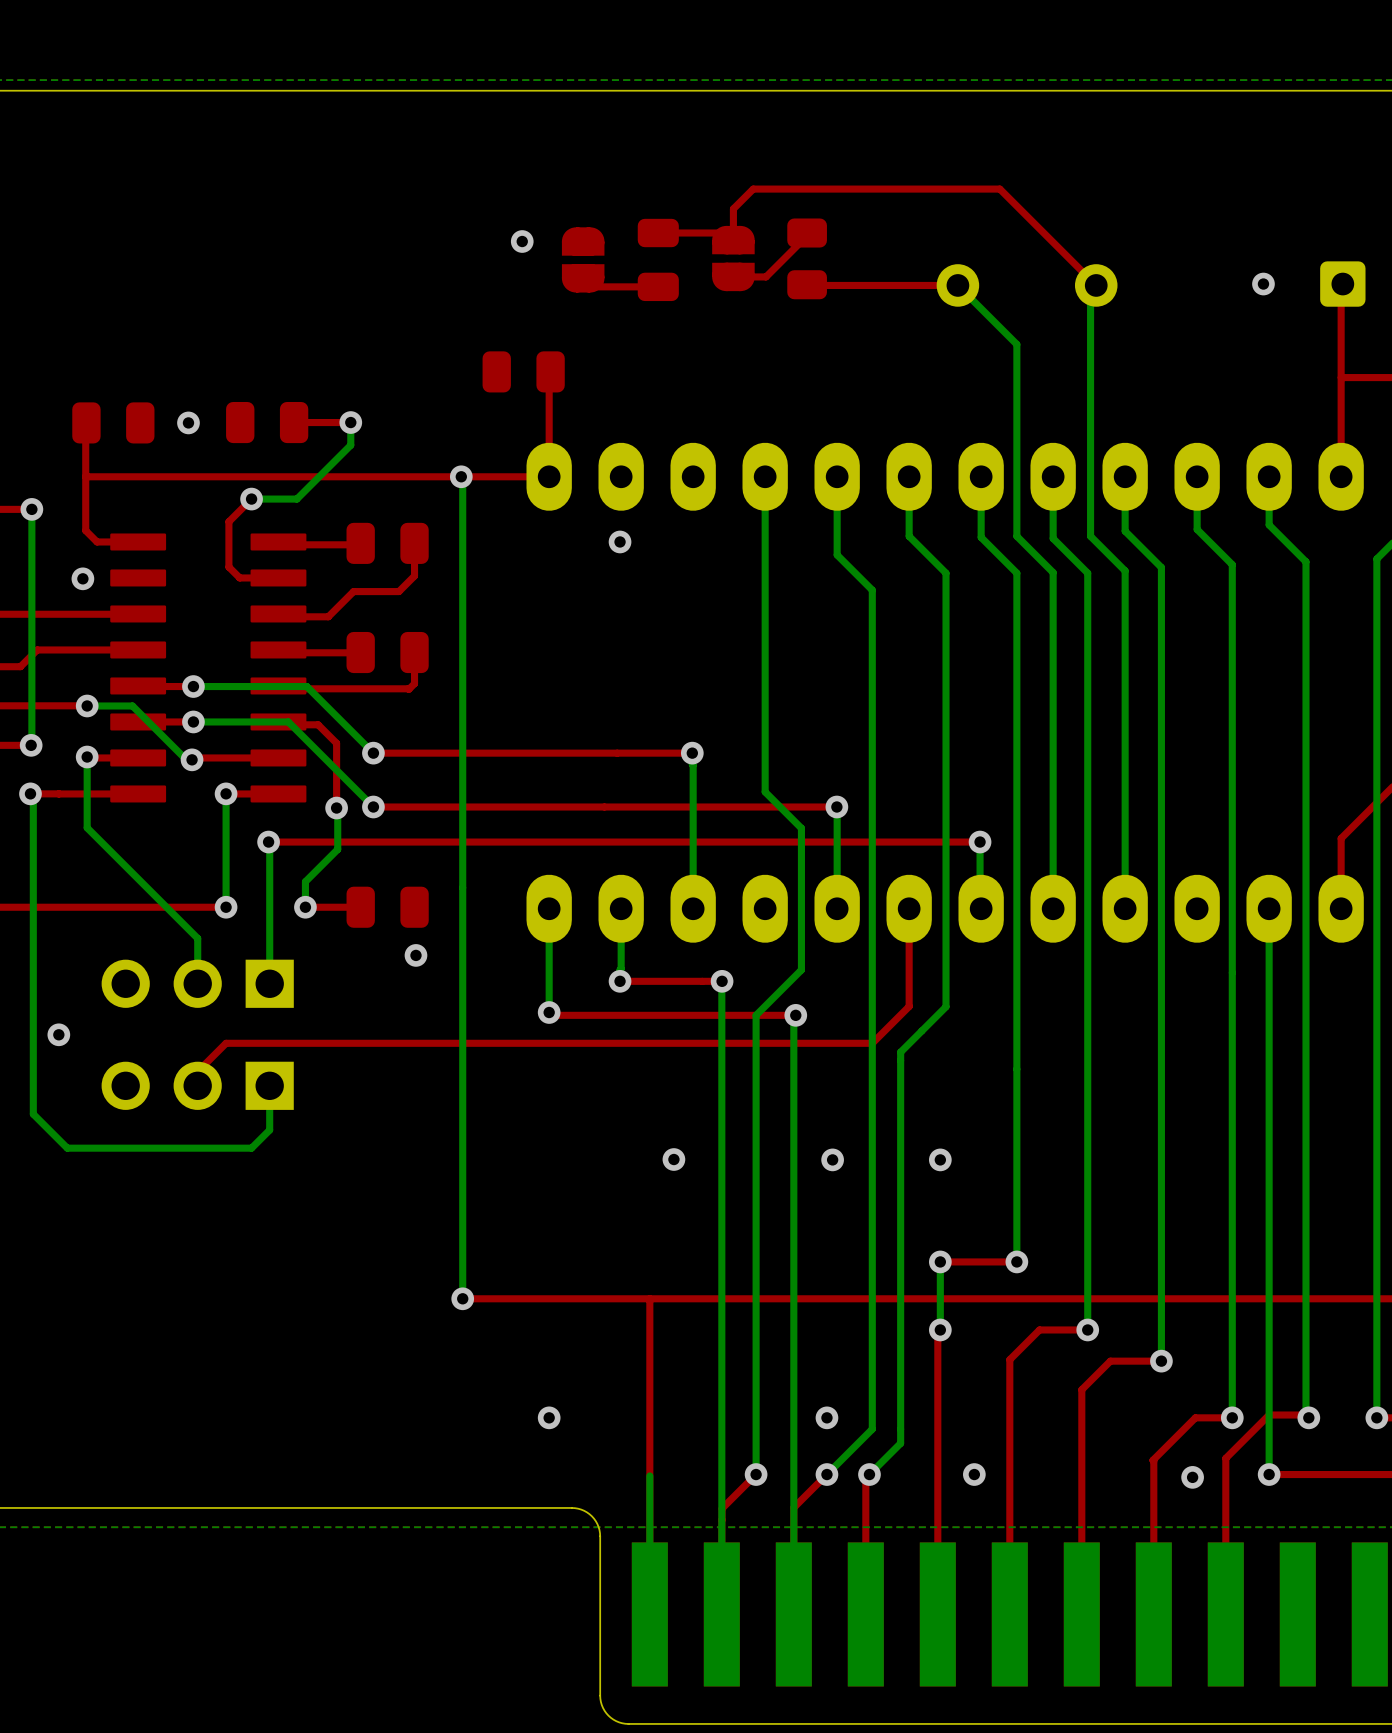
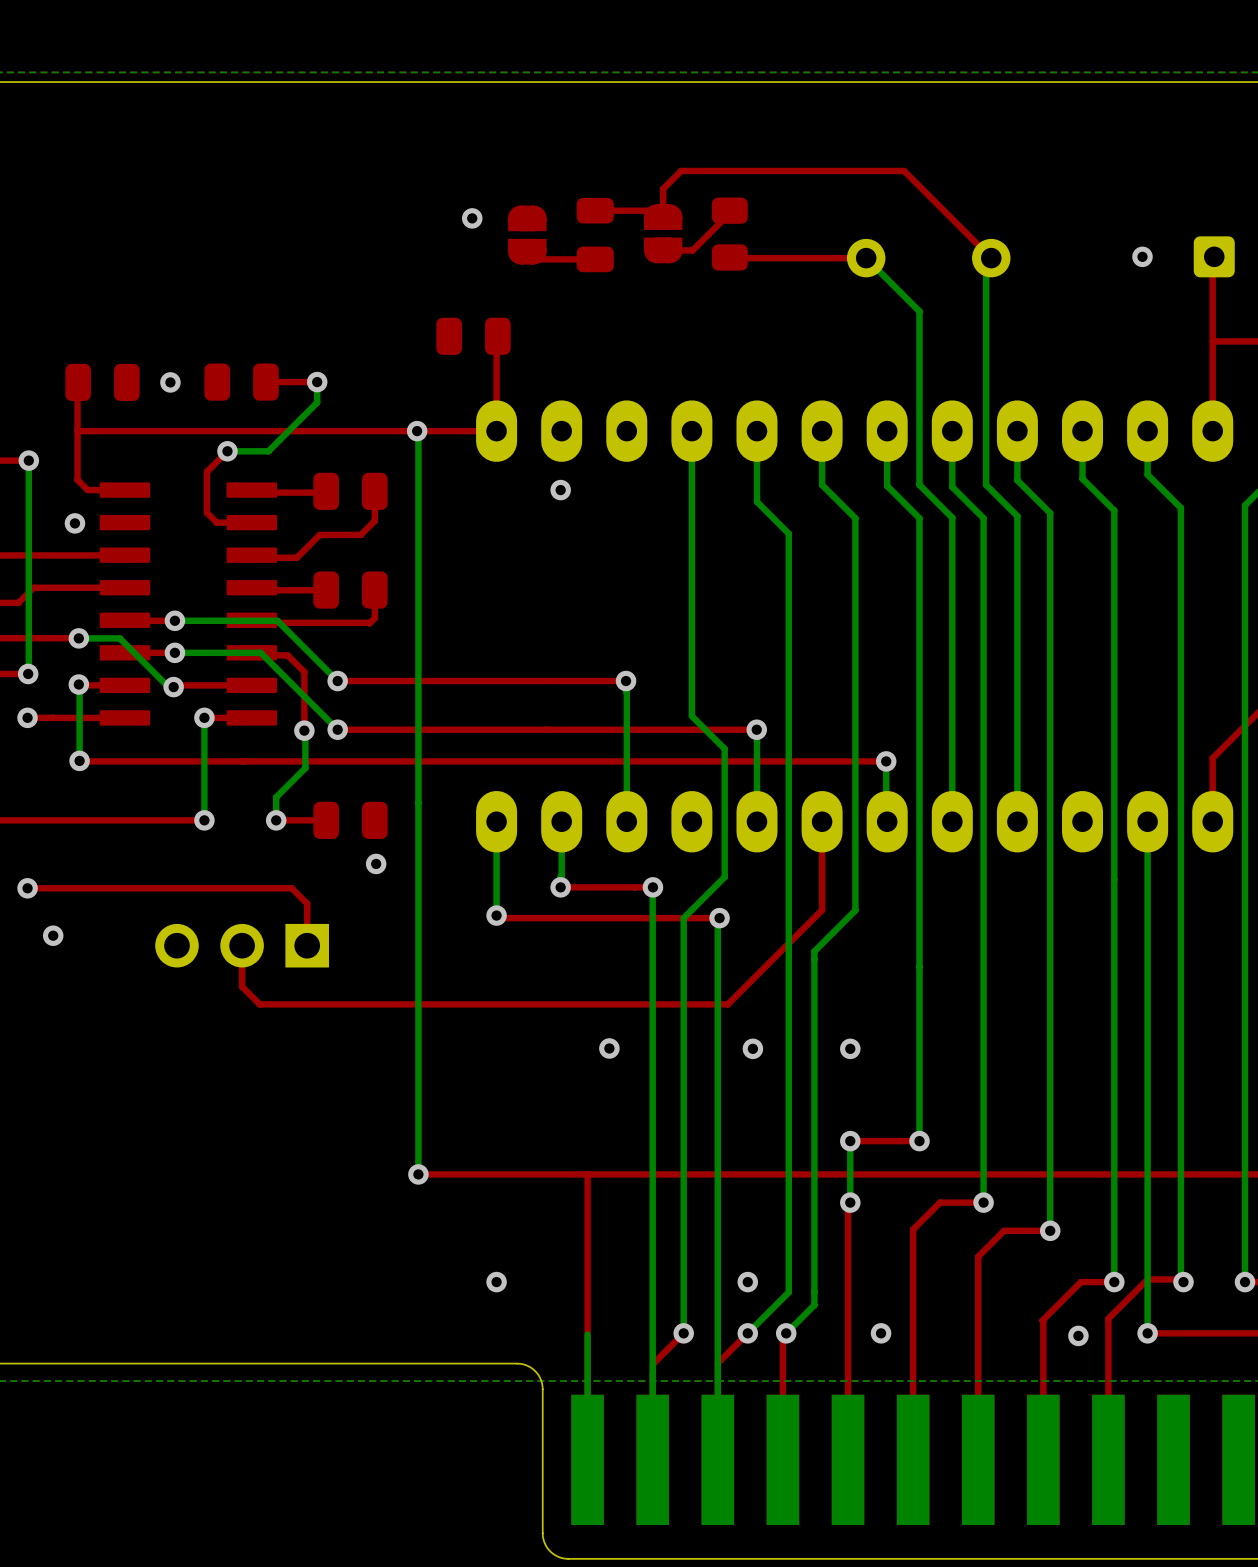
bottom track: (87, 757) (87, 827) (197, 938) (197, 983) -> (78, 684) (79, 760)
bottom track: (33, 796) (33, 1114) (67, 1148) (251, 1148) (269, 1130) (269, 1085) -> none
top track: none -> (79, 760) (242, 761)
via: none -> (79, 760)
bottom track: (268, 842) (269, 983) -> none
via: (268, 842) -> none
top track: none -> (27, 888) (291, 888) (307, 903) (307, 945)
via: none -> (27, 888)
part: (197, 983) -> none
top track: (872, 1043) (226, 1043) (197, 1071) (197, 1085) -> (788, 943) (727, 1004) (259, 1004) (242, 986) (242, 945)
part: none -> (242, 945)
part: (197, 1085) -> none

